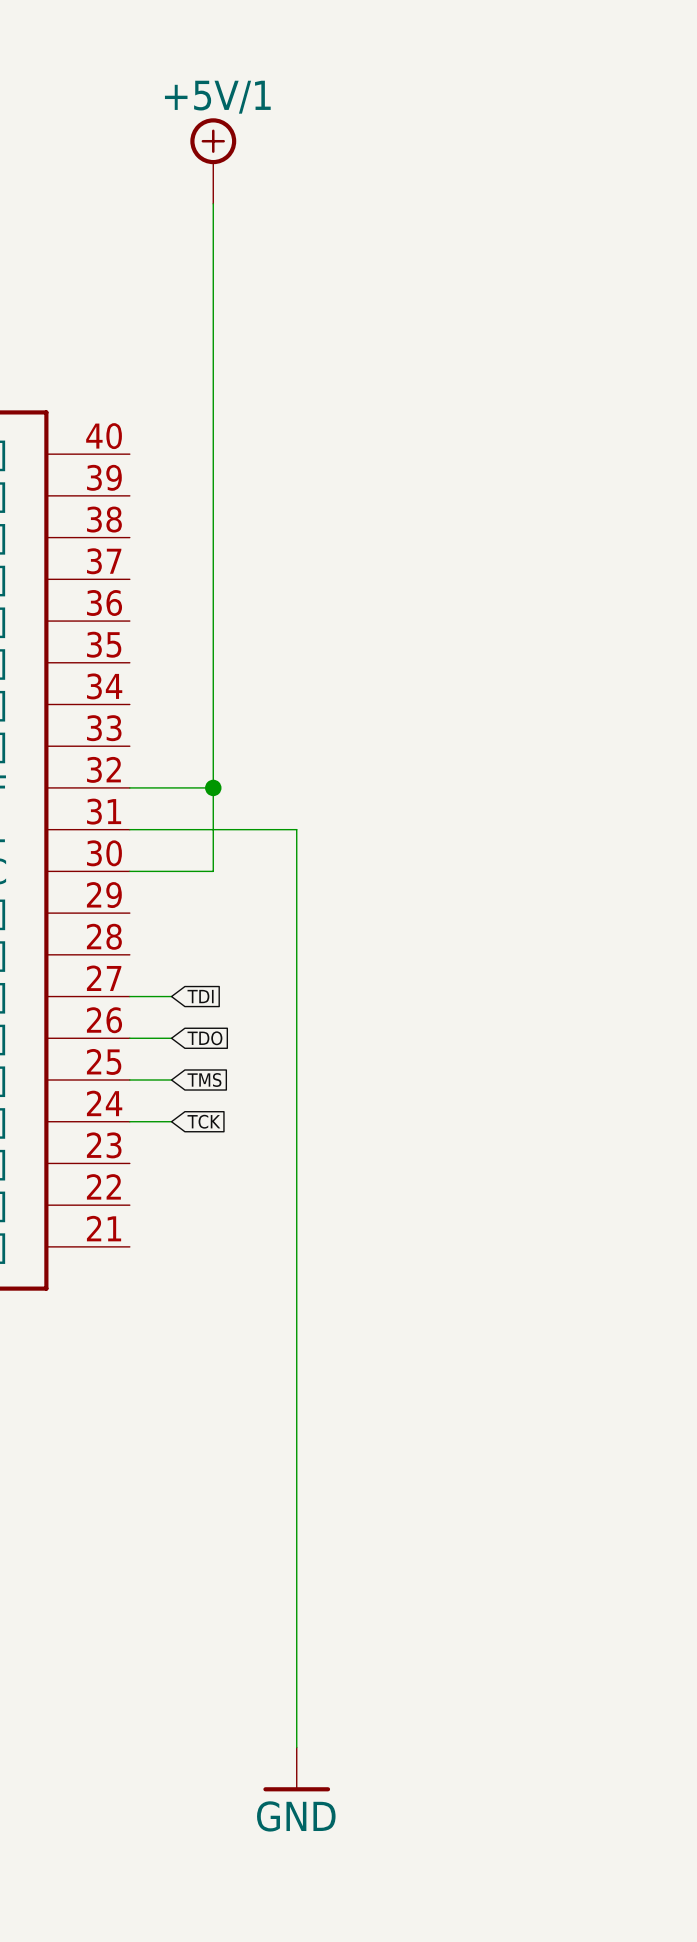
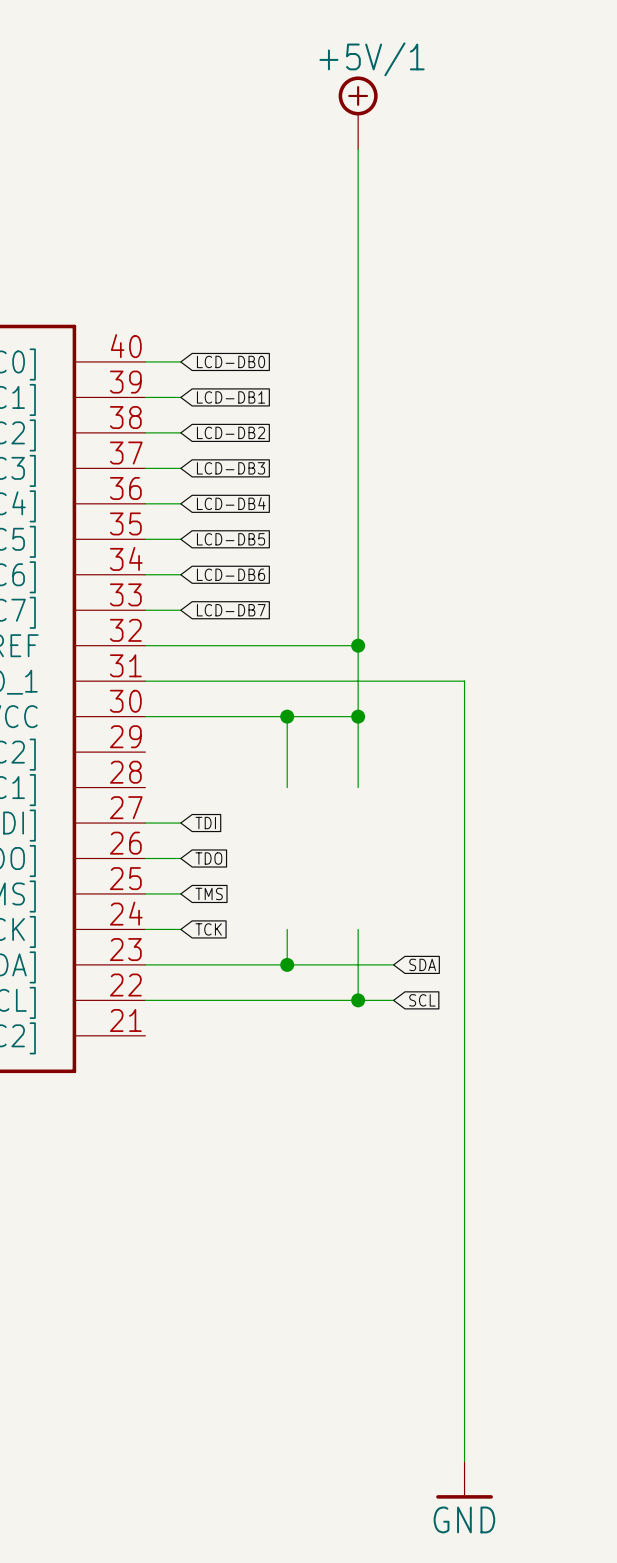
power symbol position: +5V/1 (213, 161) -> +5V/1 (358, 112)
wire: (213, 203) (213, 871) -> (358, 716) (216, 716)
wire: none -> (358, 149) (358, 787)
wire: none -> (145, 361) (180, 361)
global label: none -> LCD-DB0 (231, 361)
wire: none -> (145, 397) (180, 397)
global label: none -> LCD-DB1 (231, 397)
wire: none -> (145, 432) (180, 432)
global label: none -> LCD-DB2 (231, 432)
wire: none -> (145, 468) (180, 468)
global label: none -> LCD-DB3 (231, 468)
wire: none -> (145, 503) (180, 503)
global label: none -> LCD-DB4 (231, 503)
wire: none -> (145, 539) (180, 539)
global label: none -> LCD-DB5 (231, 539)
wire: none -> (145, 574) (180, 574)
global label: none -> LCD-DB6 (231, 574)
wire: none -> (145, 610) (180, 610)
global label: none -> LCD-DB7 (231, 610)
wire: none -> (216, 645) (358, 645)
junction: (213, 787) -> none
junction: none -> (358, 645)
wire: (296, 829) (296, 871) -> (287, 681) (464, 681) (464, 1461)
junction: none -> (287, 716)
junction: none -> (358, 716)
wire: (296, 954) (296, 1121) -> none
wire: none -> (358, 929) (358, 1000)
wire: none -> (145, 964) (393, 964)
wire: (296, 1163) (296, 1747) -> none
junction: none -> (287, 964)
global label: none -> SDA (422, 964)
wire: none -> (145, 1000) (393, 1000)
junction: none -> (358, 1000)
global label: none -> SCL (422, 1000)
power symbol position: GND (296, 1769) -> GND (464, 1480)

